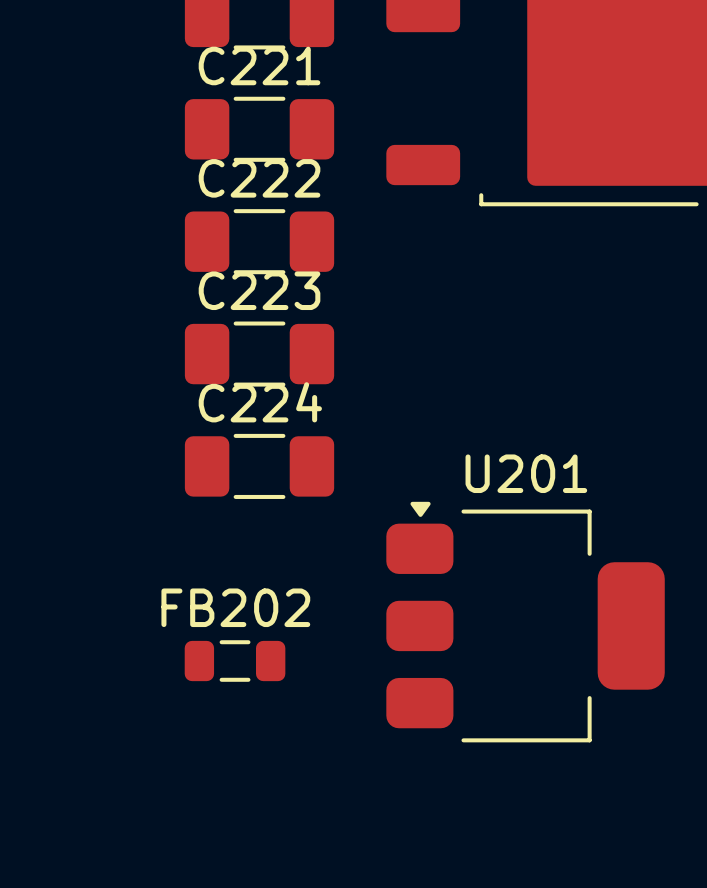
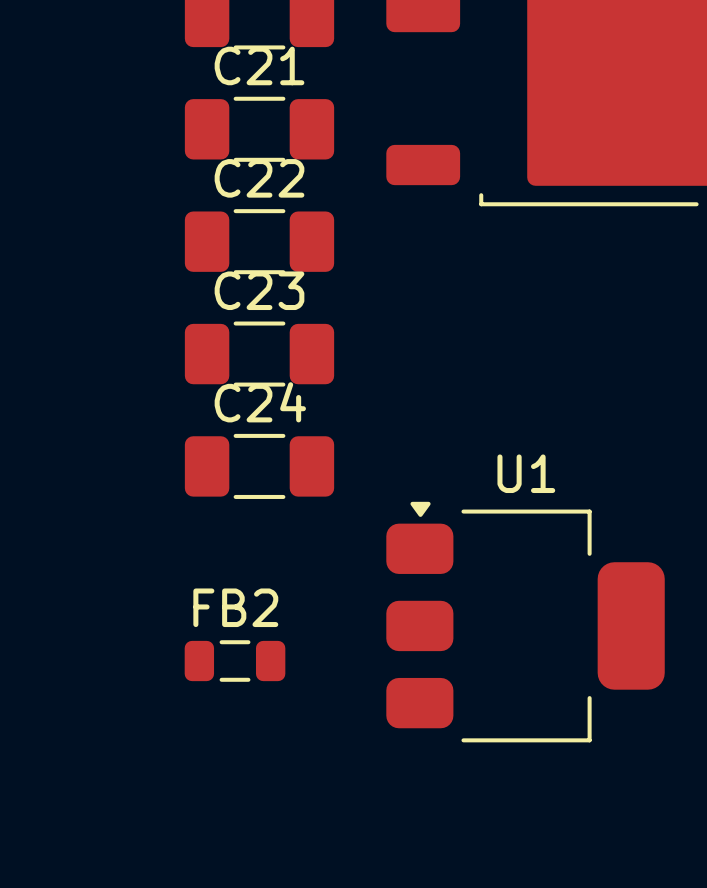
C221 name: C221 (259, 65) -> C21 (259, 65)
C222 name: C222 (259, 178) -> C22 (259, 178)
C223 name: C223 (259, 290) -> C23 (259, 290)
C224 name: C224 (260, 402) -> C24 (260, 402)
U201 name: U201 (526, 473) -> U1 (526, 473)
FB202 name: FB202 (235, 607) -> FB2 (235, 607)

